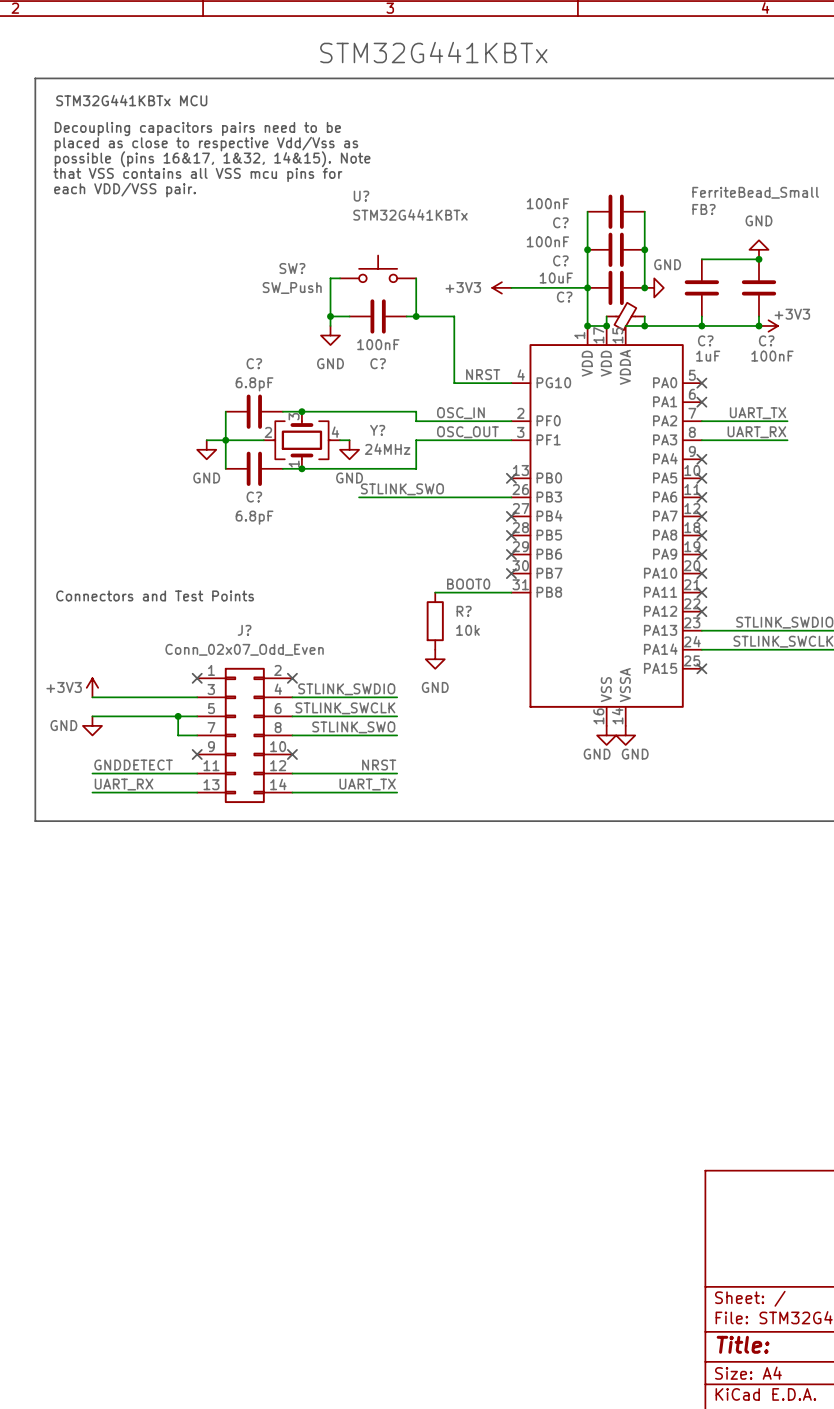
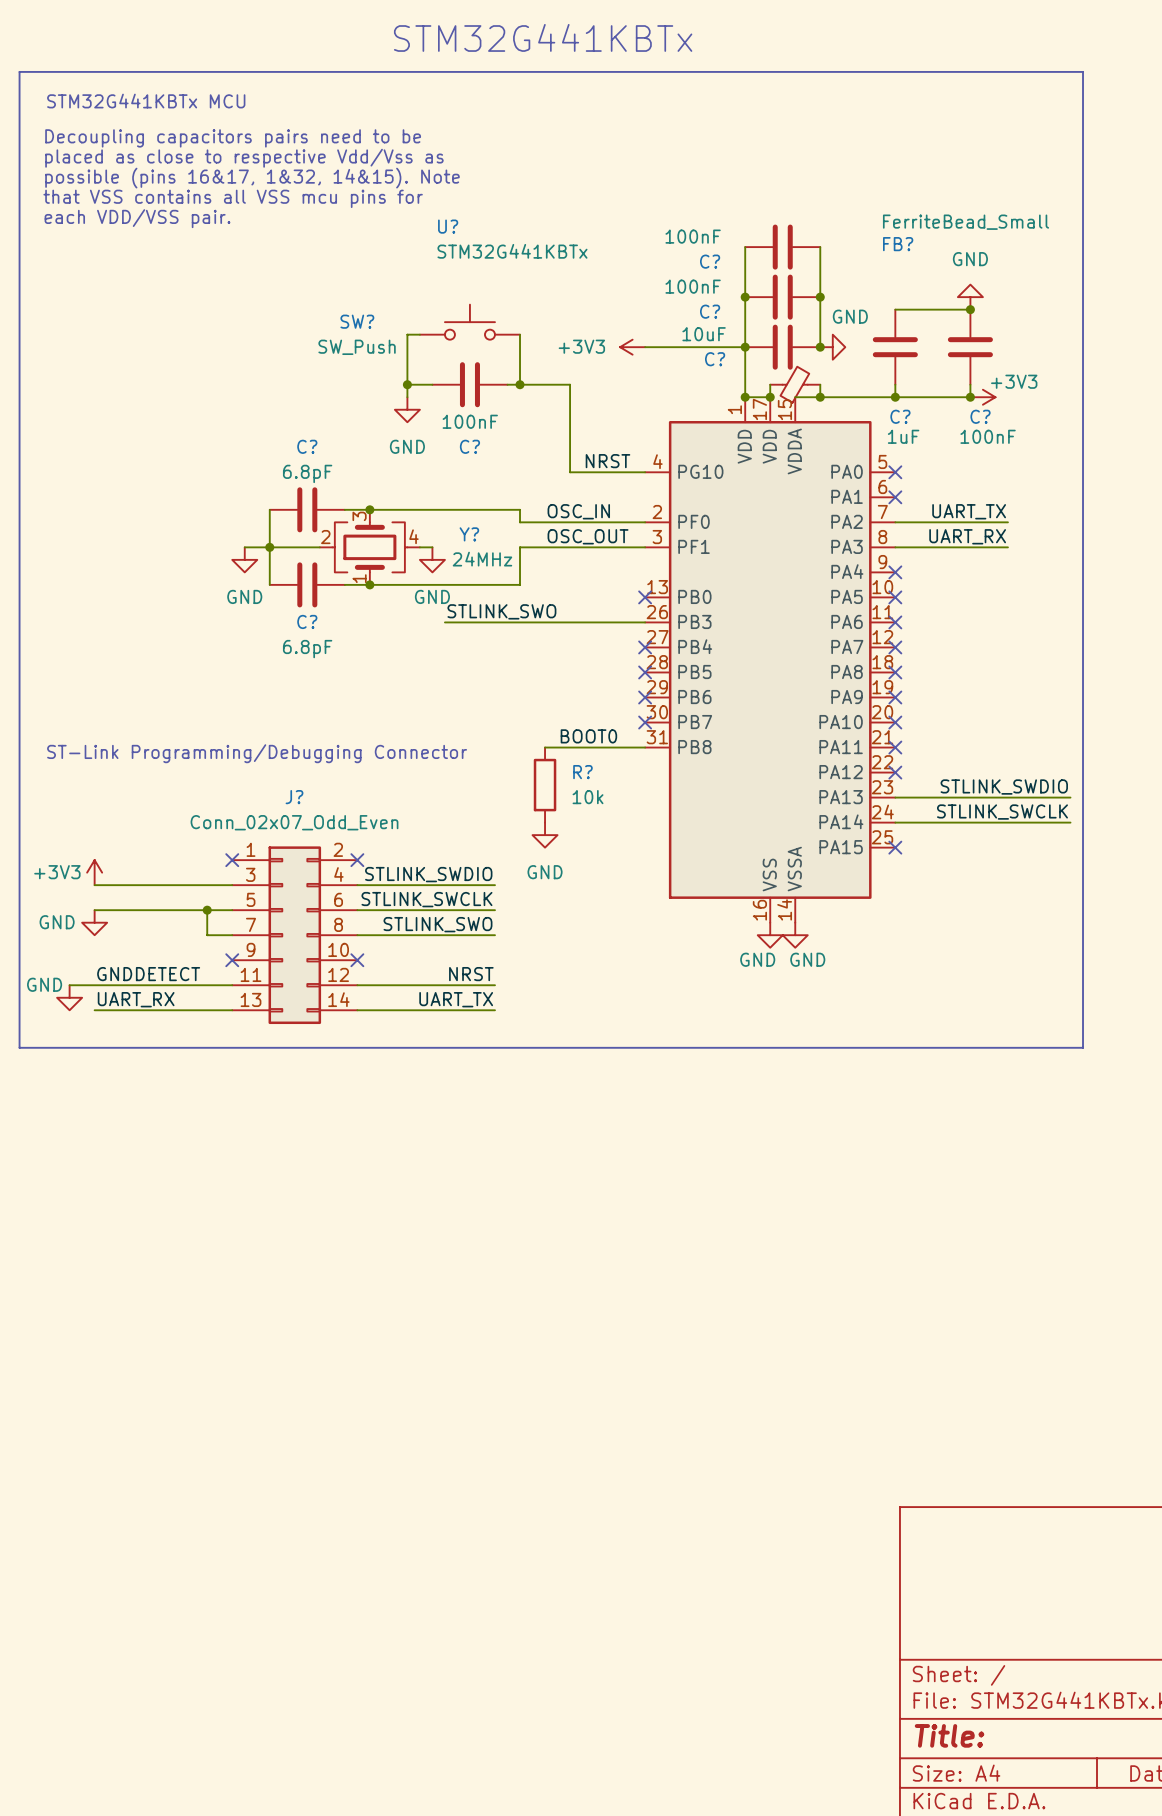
text: Connectors and Test Points (155, 595) -> ST-Link Programming/Debugging Connector (257, 753)
wire: none -> (69, 985) (94, 985)
power symbol: none -> GND (69, 997)

